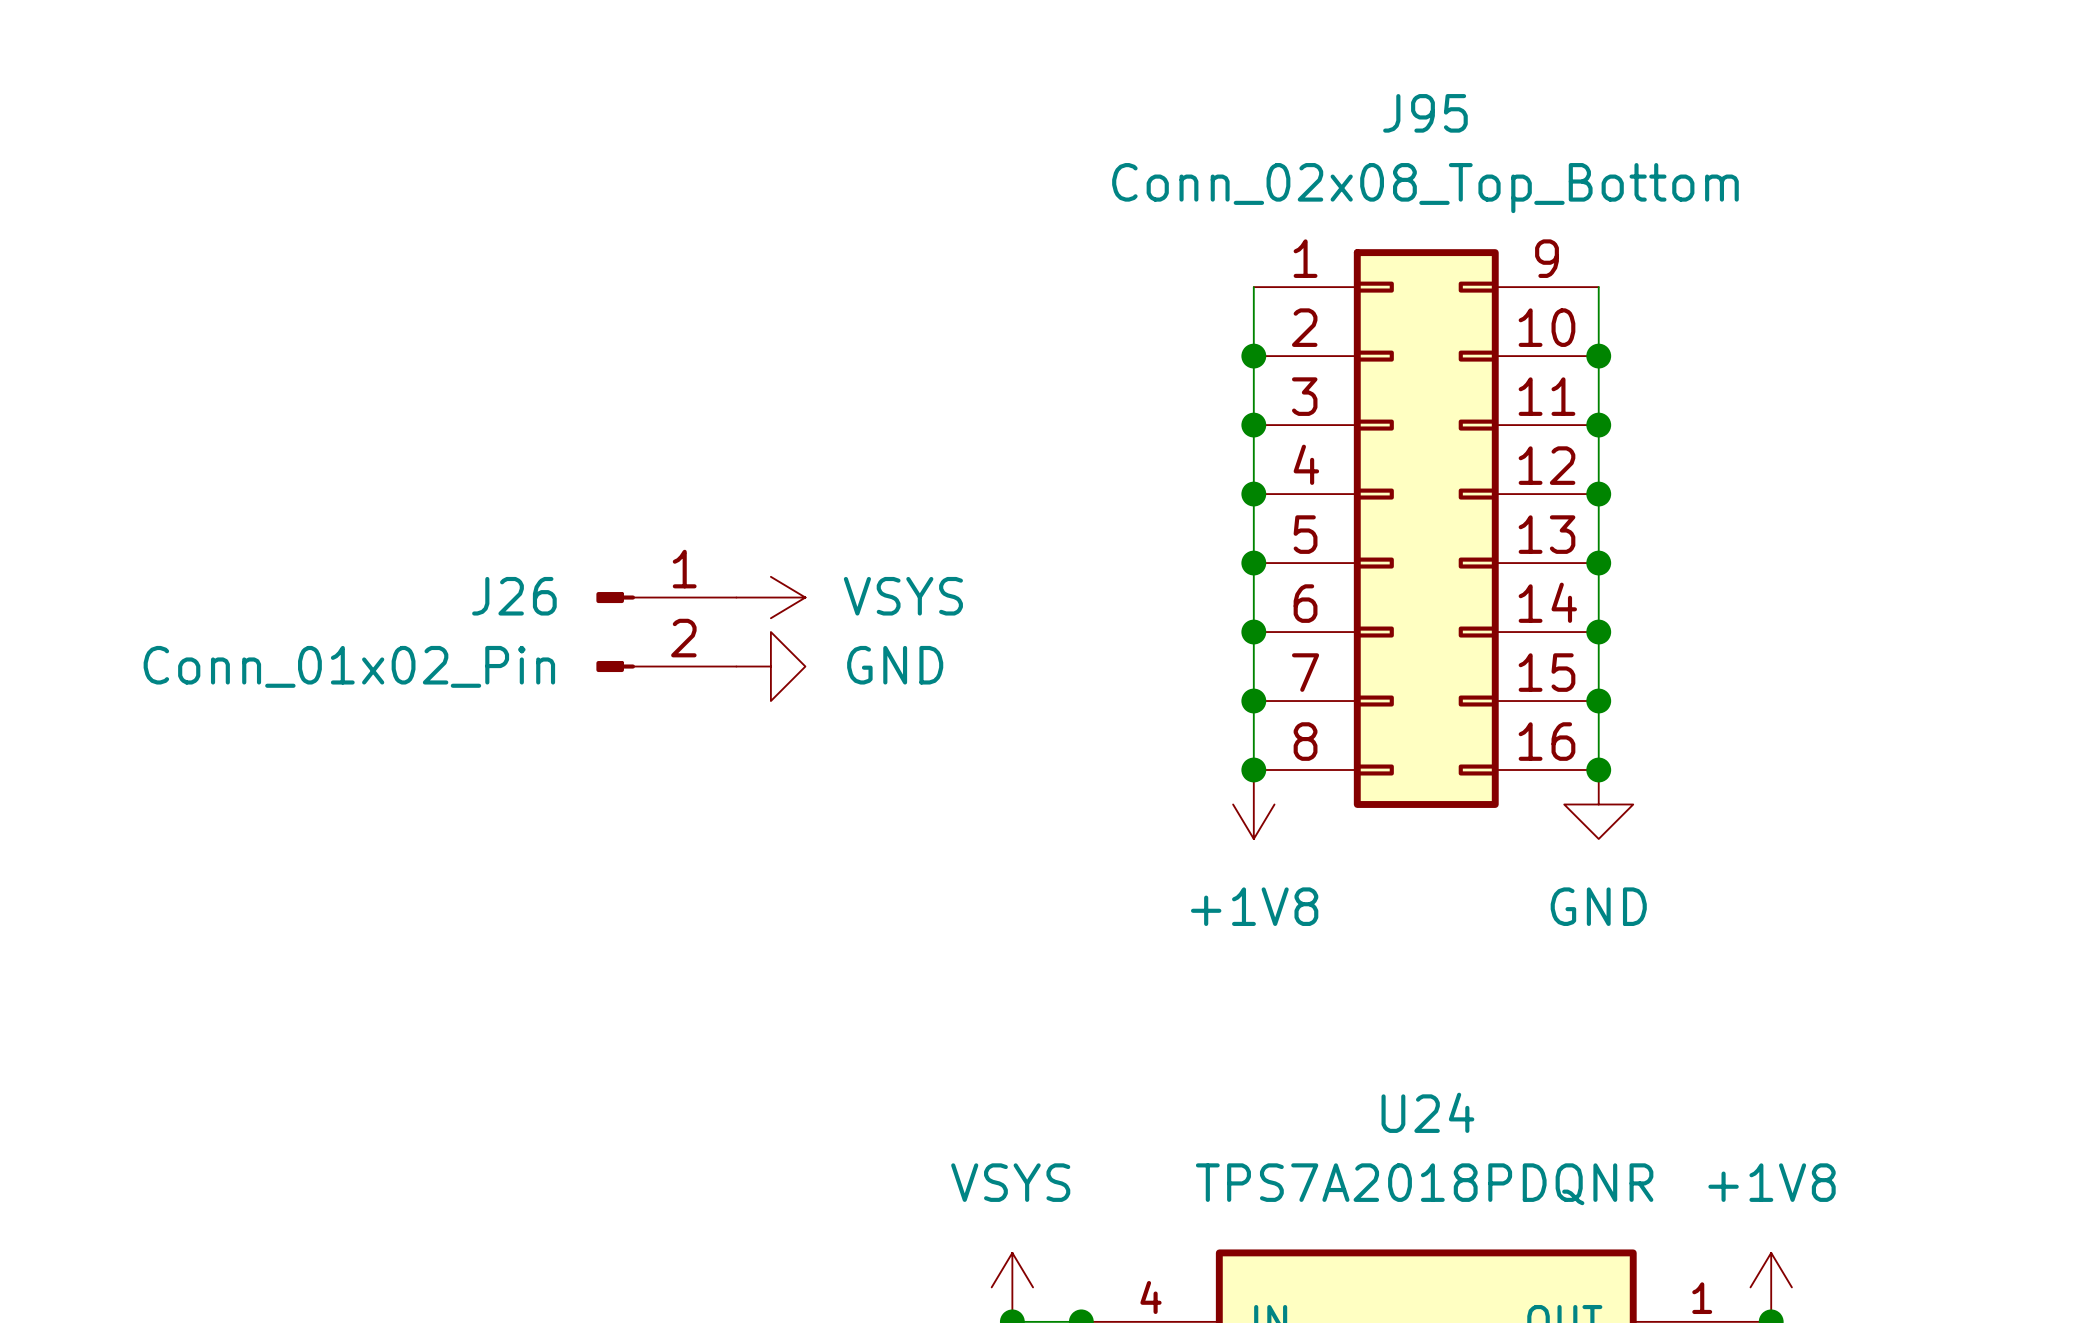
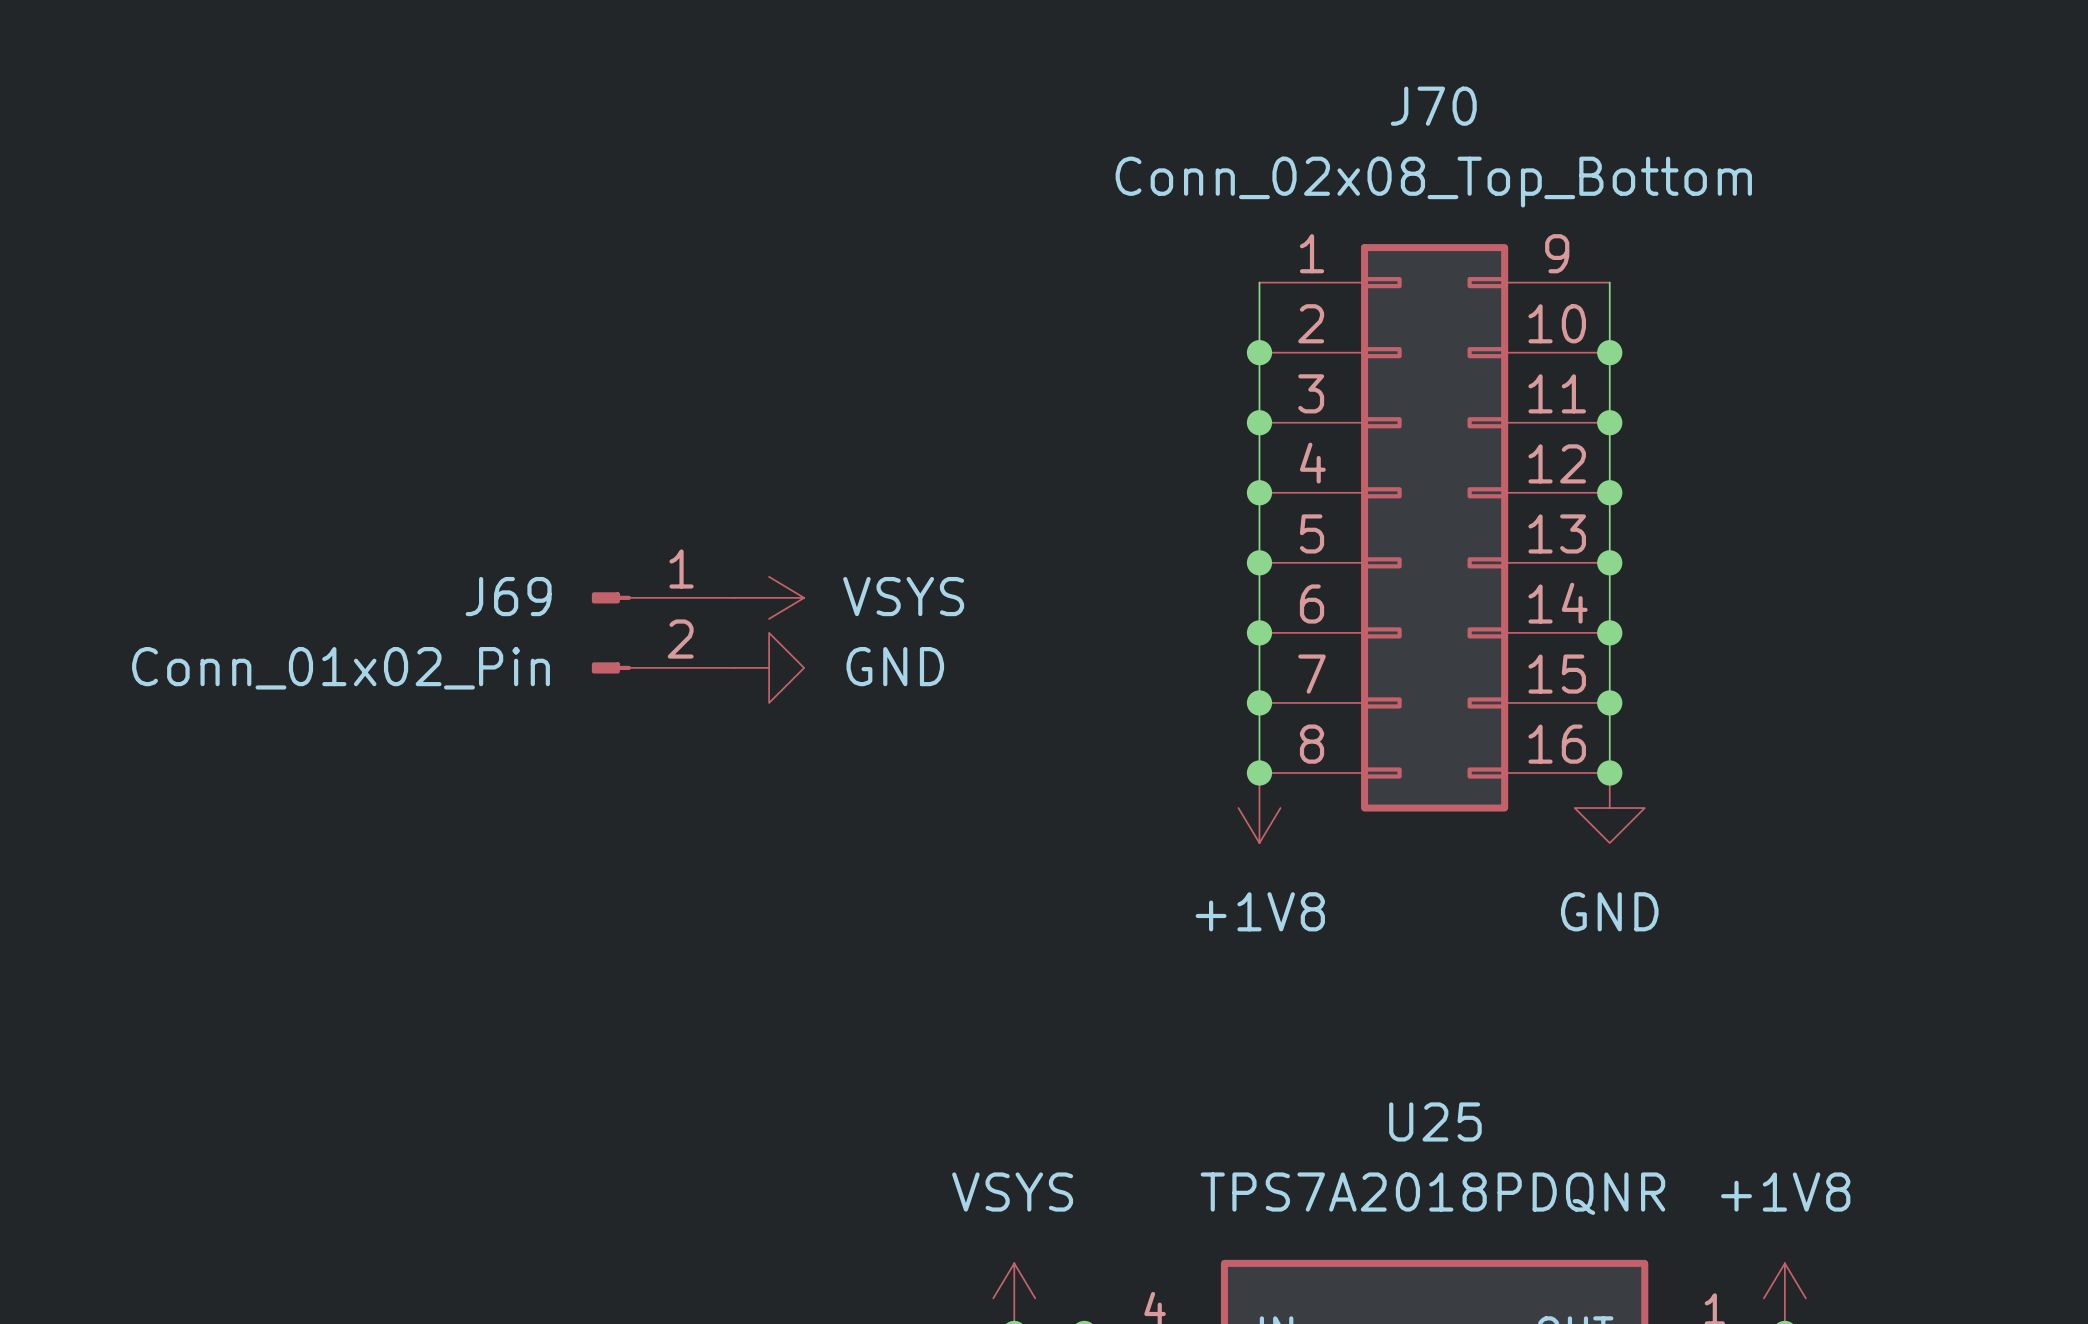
J95 name: J95 (1425, 113) -> J70 (1433, 106)
J26 name: J26 (514, 596) -> J69 (508, 596)
U24 name: U24 (1427, 1112) -> U25 (1435, 1121)

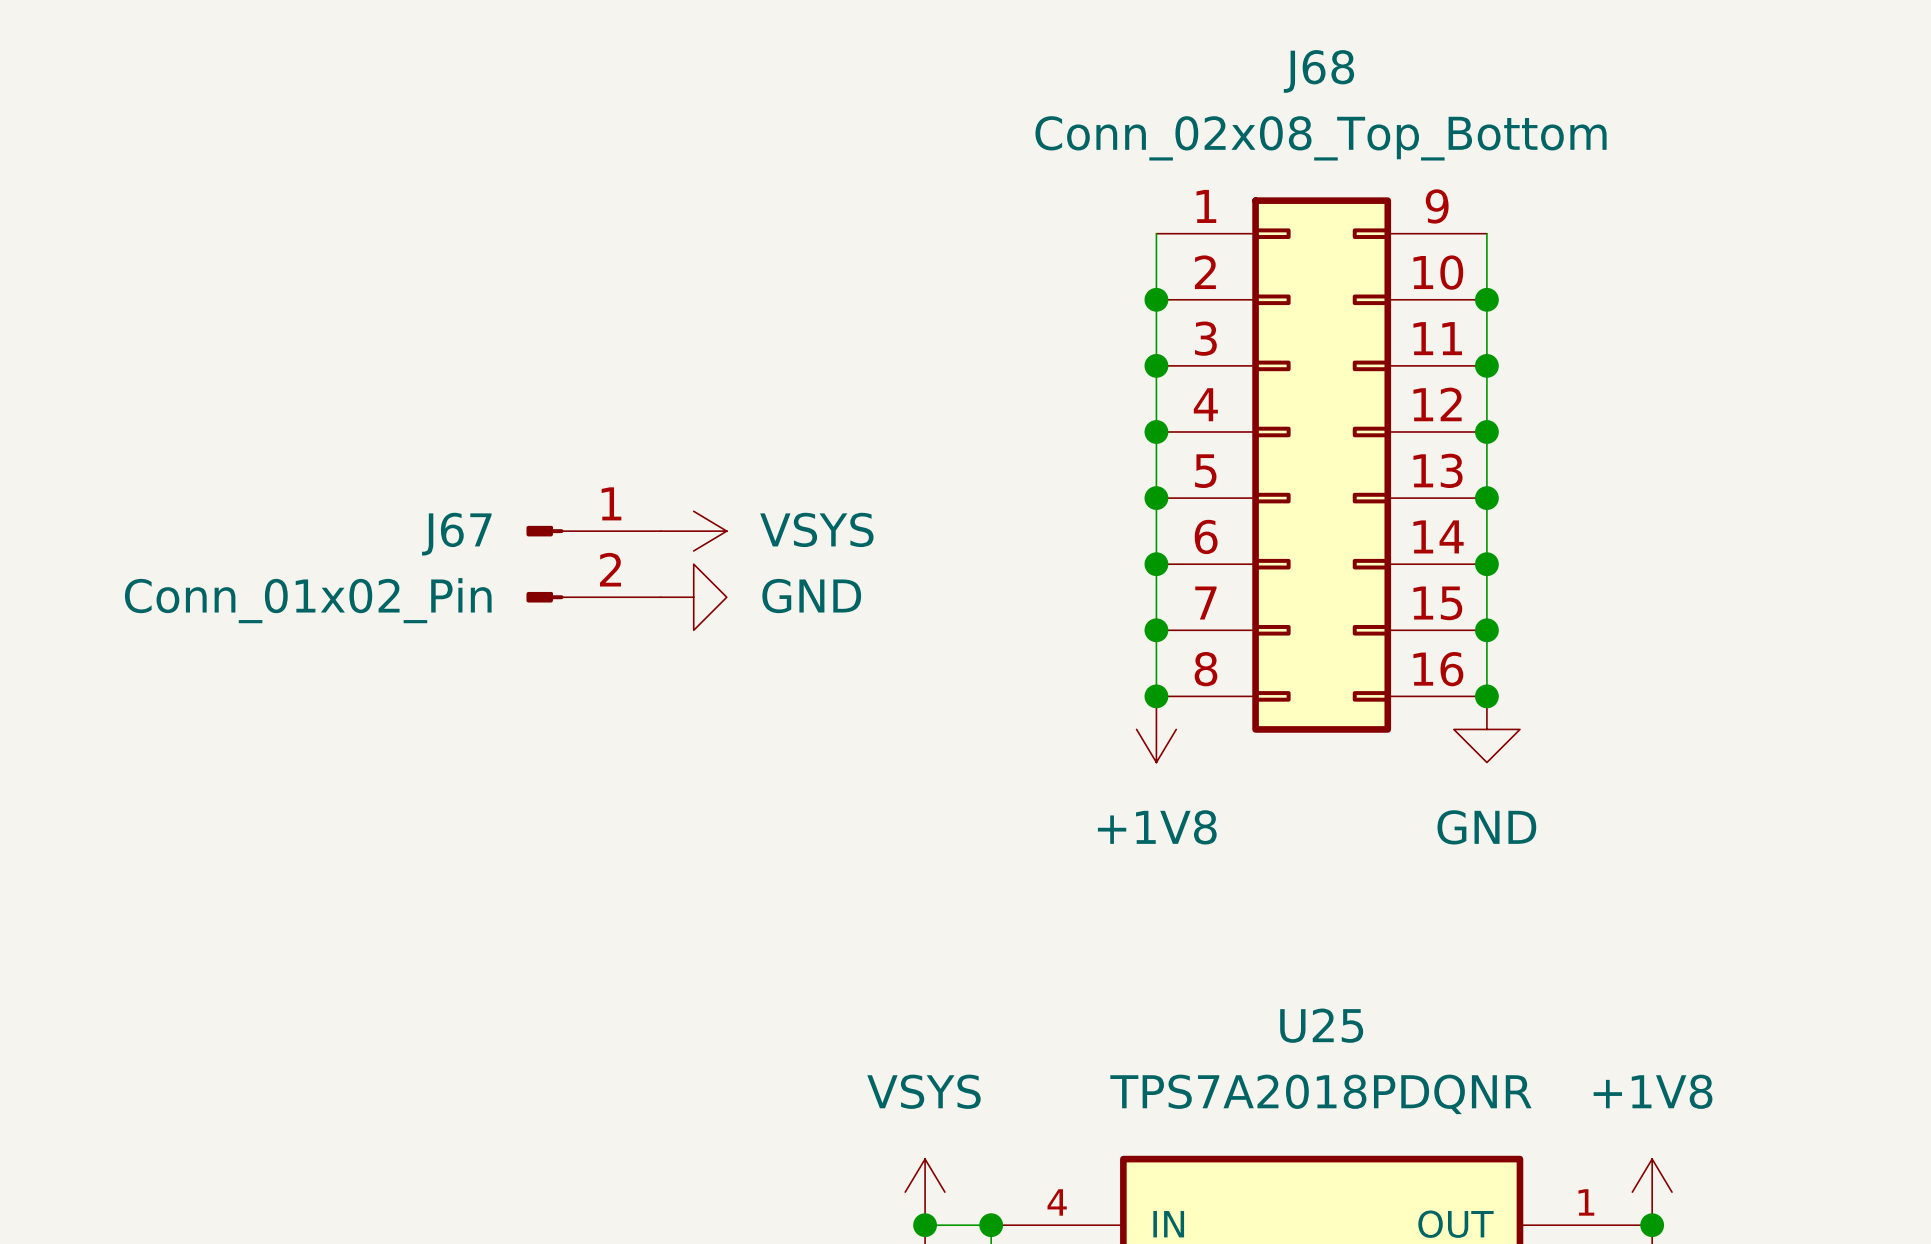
J70 name: J70 (1433, 106) -> J68 (1318, 71)
J69 name: J69 (508, 596) -> J67 (456, 534)

